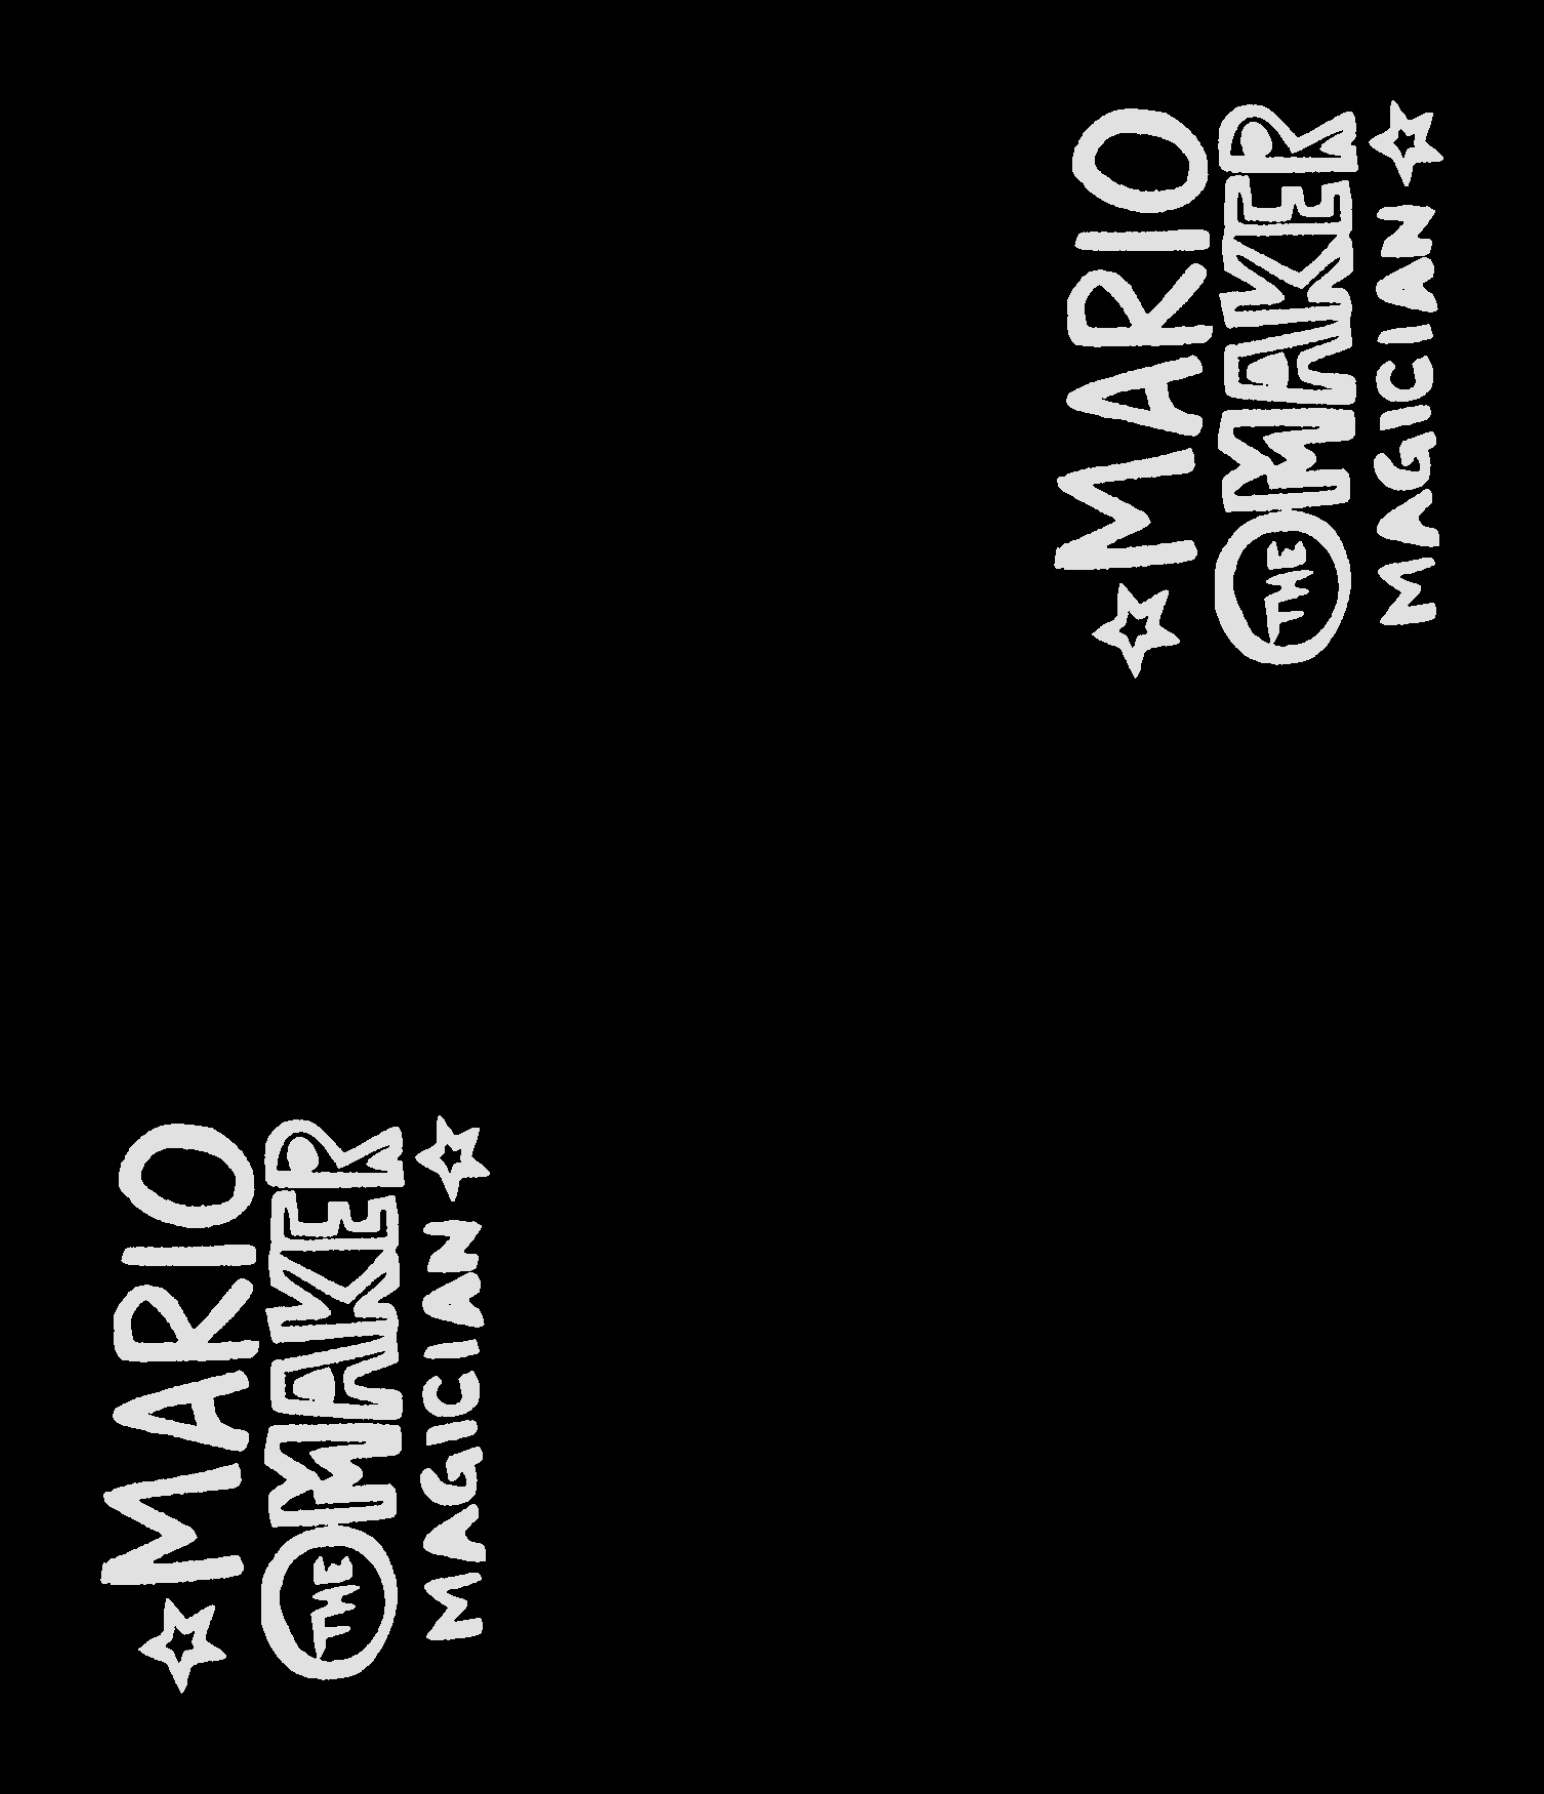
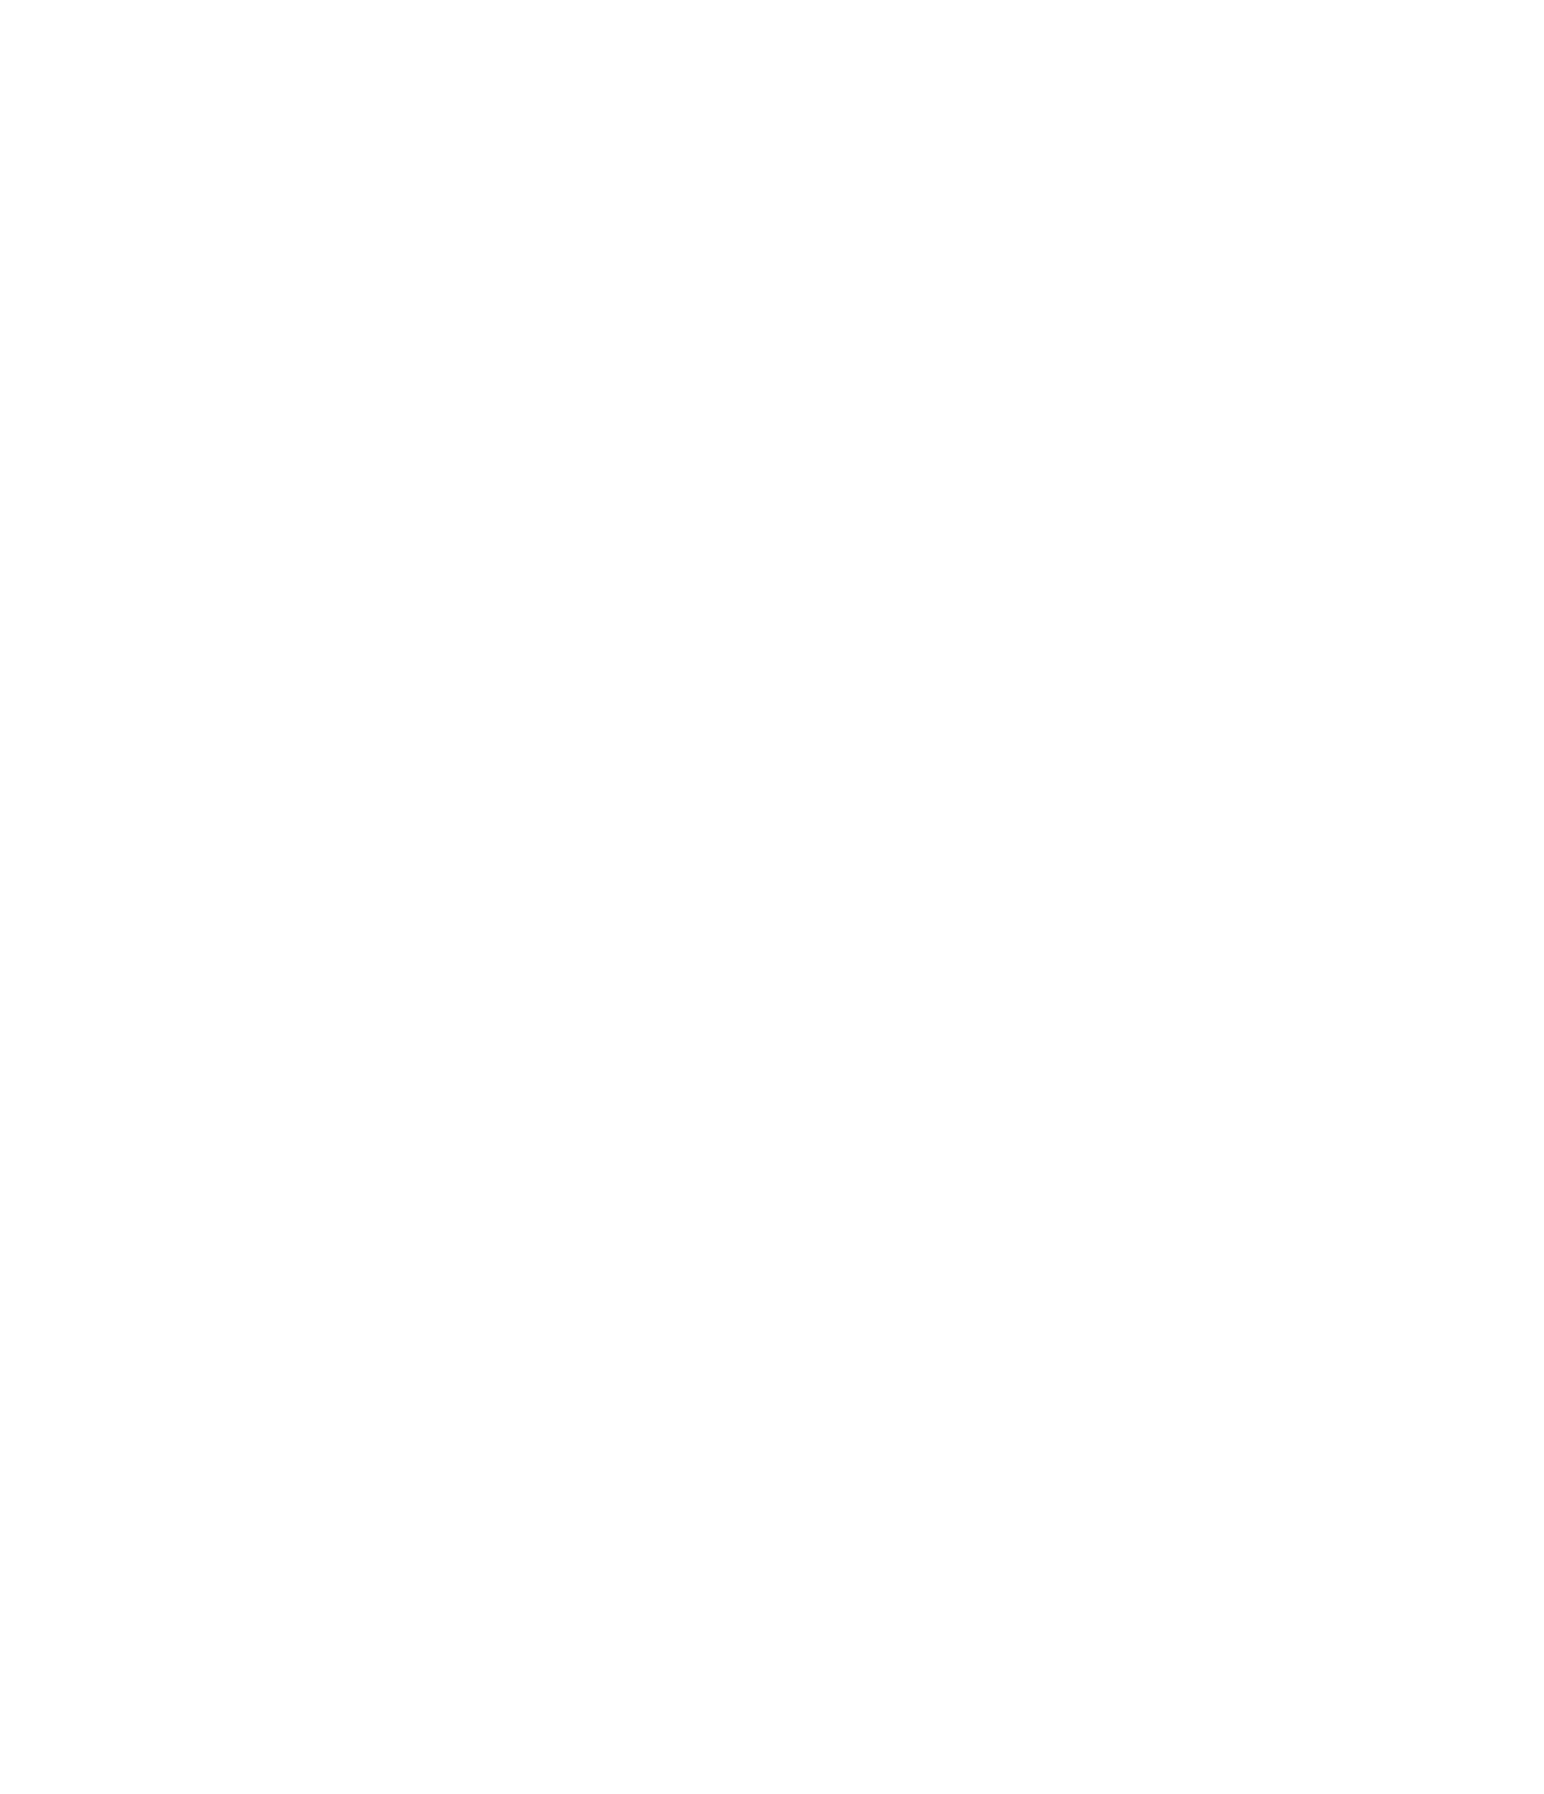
drawing: [1053, 100, 1444, 679] -> none
drawing: [100, 1115, 490, 1694] -> none

